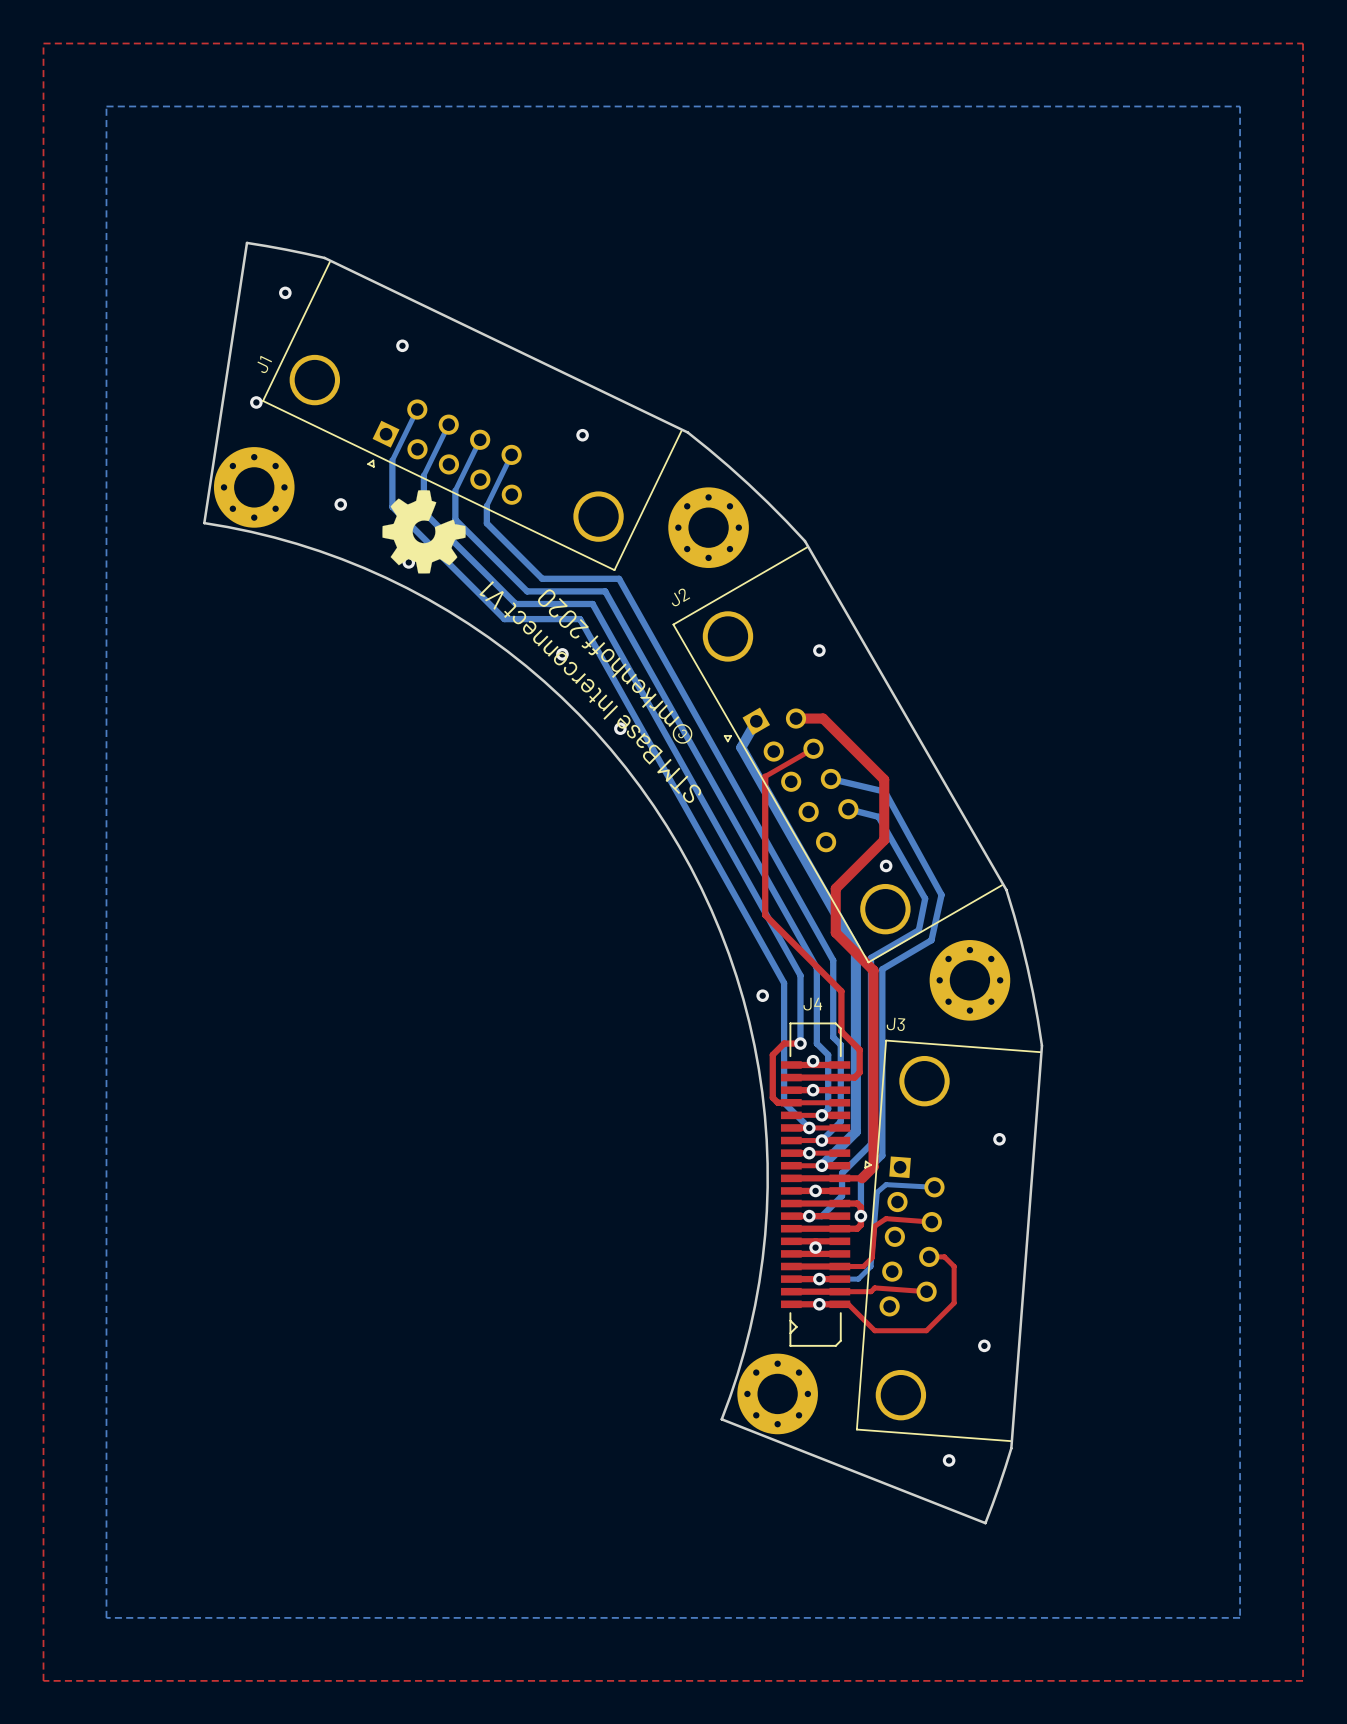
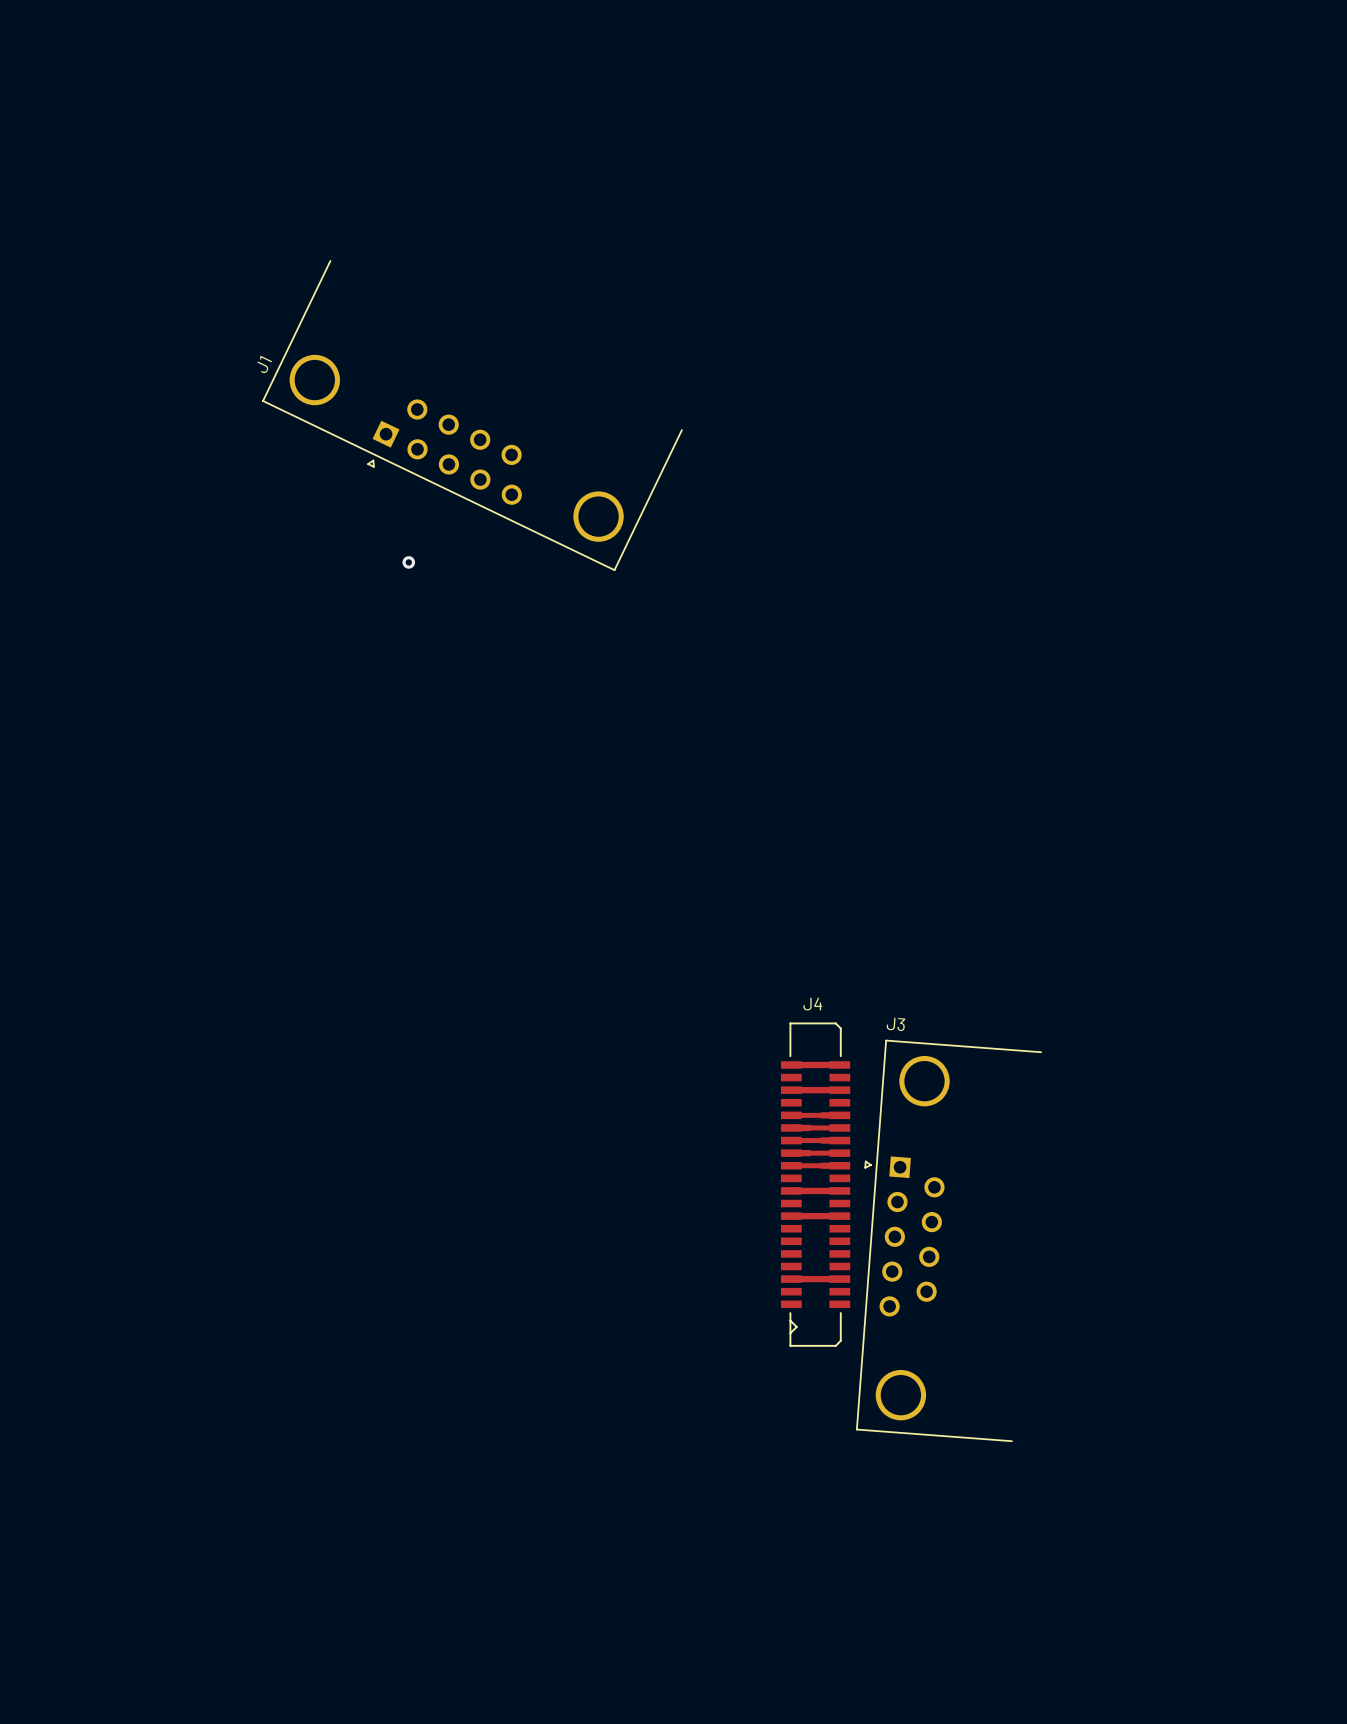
top zone outline: (43, 43) (43, 1680) (1303, 1680) (1303, 43) (43, 43) -> none
bottom zone outline: (106, 106) (106, 1617) (1240, 1617) (1240, 106) (106, 106) -> none
board edge: (246, 242) (204, 523) (274, 537) (342, 559) (407, 588) (448, 611) (507, 651) (544, 681) (578, 714) (625, 767) (666, 826) (690, 867) (711, 910) (736, 976) (749, 1022) (758, 1069) (764, 1116) (767, 1163) (766, 1211) (762, 1258) (750, 1328) (737, 1374) (721, 1419) (985, 1523) (1011, 1448) (1041, 1045) (1027, 967) (1006, 890) (804, 541) (767, 502) (728, 466) (687, 432) (324, 257) (246, 242) -> none
via: (285, 292) -> none
via: (402, 345) -> none
via: (256, 402) -> none
bottom track: (417, 409) (392, 460) (392, 507) (504, 619) (580, 619) (784, 983) (784, 1102) (809, 1127) -> none
bottom track: (448, 424) (423, 475) (423, 512) (515, 603) (592, 603) (800, 975) (800, 1043) -> none
via: (582, 435) -> none
bottom track: (480, 439) (455, 490) (455, 519) (527, 591) (605, 591) (816, 968) (816, 1043) (828, 1054) (828, 1109) (821, 1115) -> none
bottom track: (511, 454) (486, 505) (486, 523) (542, 578) (619, 578) (833, 960) (833, 1037) (840, 1044) (840, 1121) (821, 1140) -> none
part: (254, 487) -> none
drawing: [382, 490, 466, 574] -> none
via: (340, 504) -> none
part: (708, 527) -> none
via: (819, 650) -> none
via: (562, 654) -> none
text: ©mrkenhoff 2020 (615, 666) -> none
text: STM Base Interconnect V1 (590, 692) -> none
top track: (796, 718) (823, 718) (884, 779) (884, 840) (835, 888) (835, 932) (873, 970) (873, 1167) (862, 1178) (791, 1178) -> none
bottom track: (756, 721) (741, 747) (855, 949) (855, 1131) (821, 1165) -> none
via: (620, 728) -> none
top track: (813, 748) (765, 776) (765, 915) (841, 991) (841, 1031) (859, 1049) (859, 1072) (854, 1077) (791, 1077) -> none
J2: (838, 754) -> none
bottom track: (830, 778) (884, 791) (941, 894) (931, 940) (882, 969) (882, 1155) (860, 1177) (860, 1216) -> none
bottom track: (848, 809) (878, 816) (925, 898) (918, 930) (871, 957) (871, 1144) (842, 1173) (842, 1195) (821, 1216) (809, 1216) -> none
via: (886, 865) -> none
part: (969, 980) -> none
via: (762, 995) -> none
top track: (800, 1043) (784, 1043) (772, 1054) (772, 1097) (777, 1102) (839, 1102) -> none
via: (800, 1043) -> none
via: (813, 1061) -> none
via: (813, 1090) -> none
via: (821, 1115) -> none
via: (809, 1127) -> none
via: (999, 1139) -> none
via: (821, 1140) -> none
via: (809, 1153) -> none
via: (821, 1165) -> none
bottom track: (934, 1187) (886, 1184) (877, 1192) (871, 1266) (858, 1279) (819, 1279) -> none
via: (815, 1190) -> none
top track: (791, 1203) (857, 1203) (860, 1207) (860, 1224) (857, 1228) (791, 1228) -> none
via: (809, 1216) -> none
via: (860, 1216) -> none
top track: (931, 1222) (886, 1218) (874, 1226) (872, 1257) (863, 1266) (791, 1266) -> none
top track: (791, 1241) (839, 1241) -> none
via: (815, 1247) -> none
top track: (791, 1253) (839, 1253) -> none
top track: (929, 1256) (944, 1256) (954, 1266) (954, 1303) (926, 1330) (874, 1330) (848, 1304) (791, 1304) -> none
via: (819, 1279) -> none
top track: (791, 1291) (871, 1291) (874, 1287) (926, 1291) -> none
via: (819, 1304) -> none
via: (984, 1345) -> none
part: (777, 1393) -> none
via: (949, 1460) -> none

